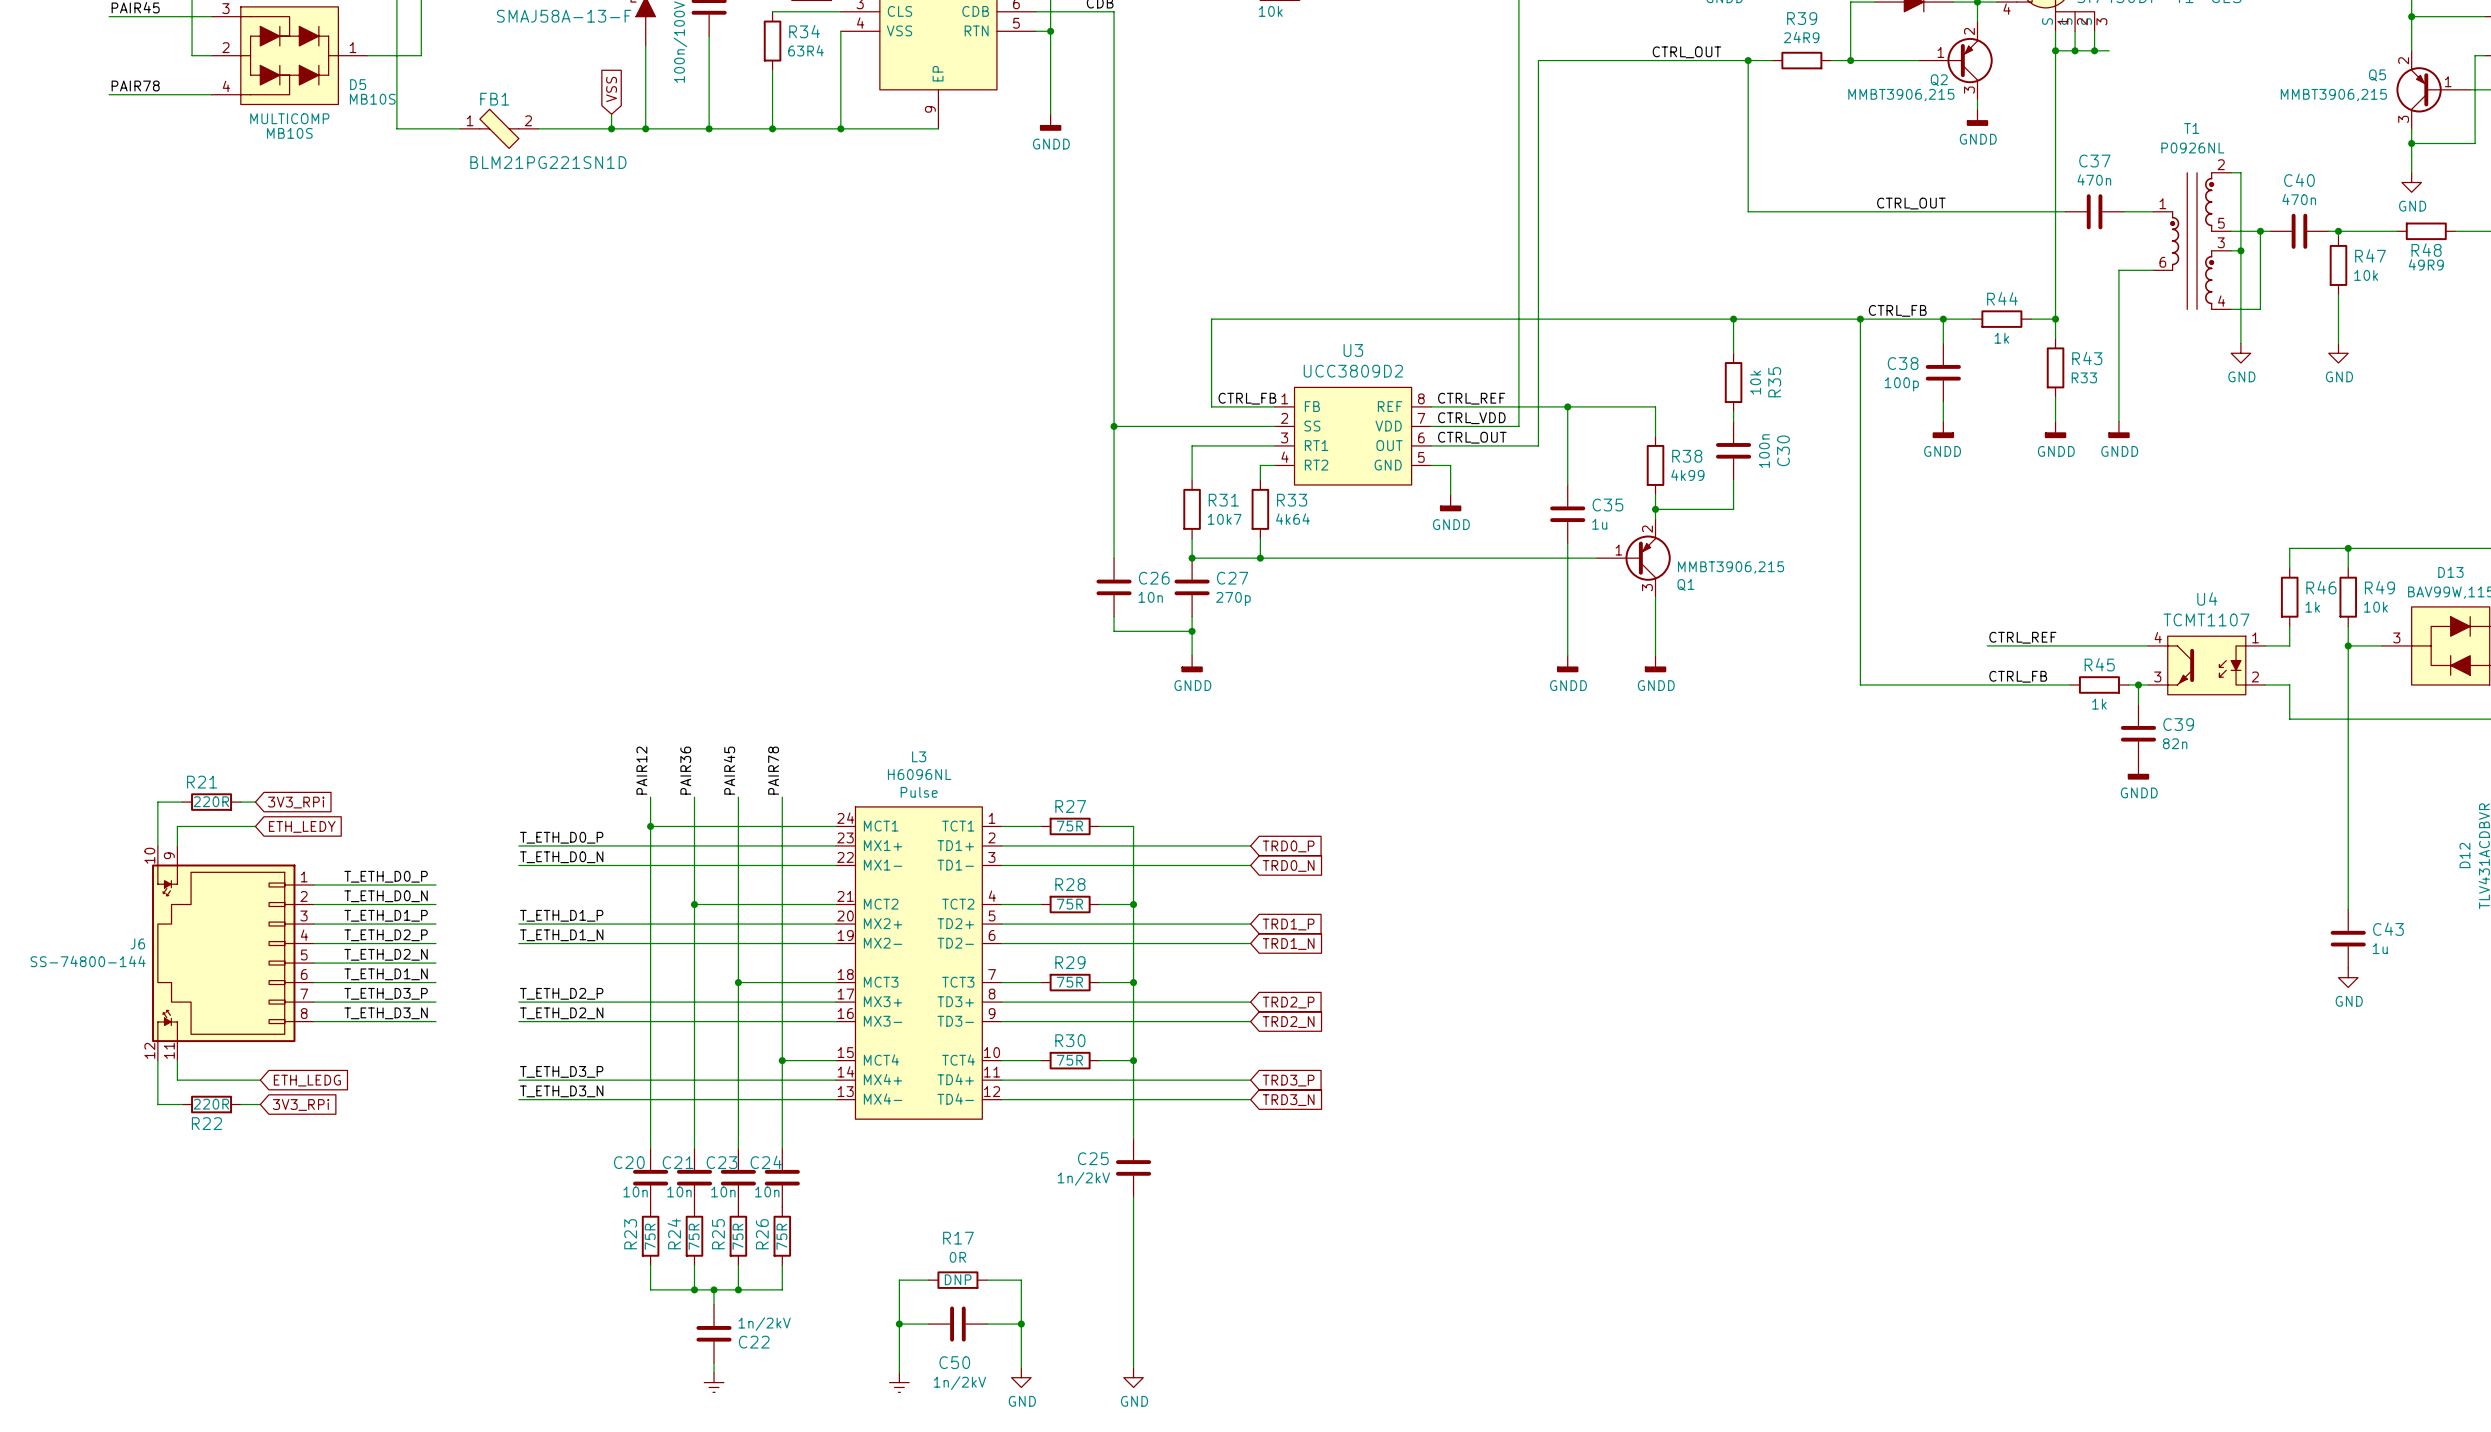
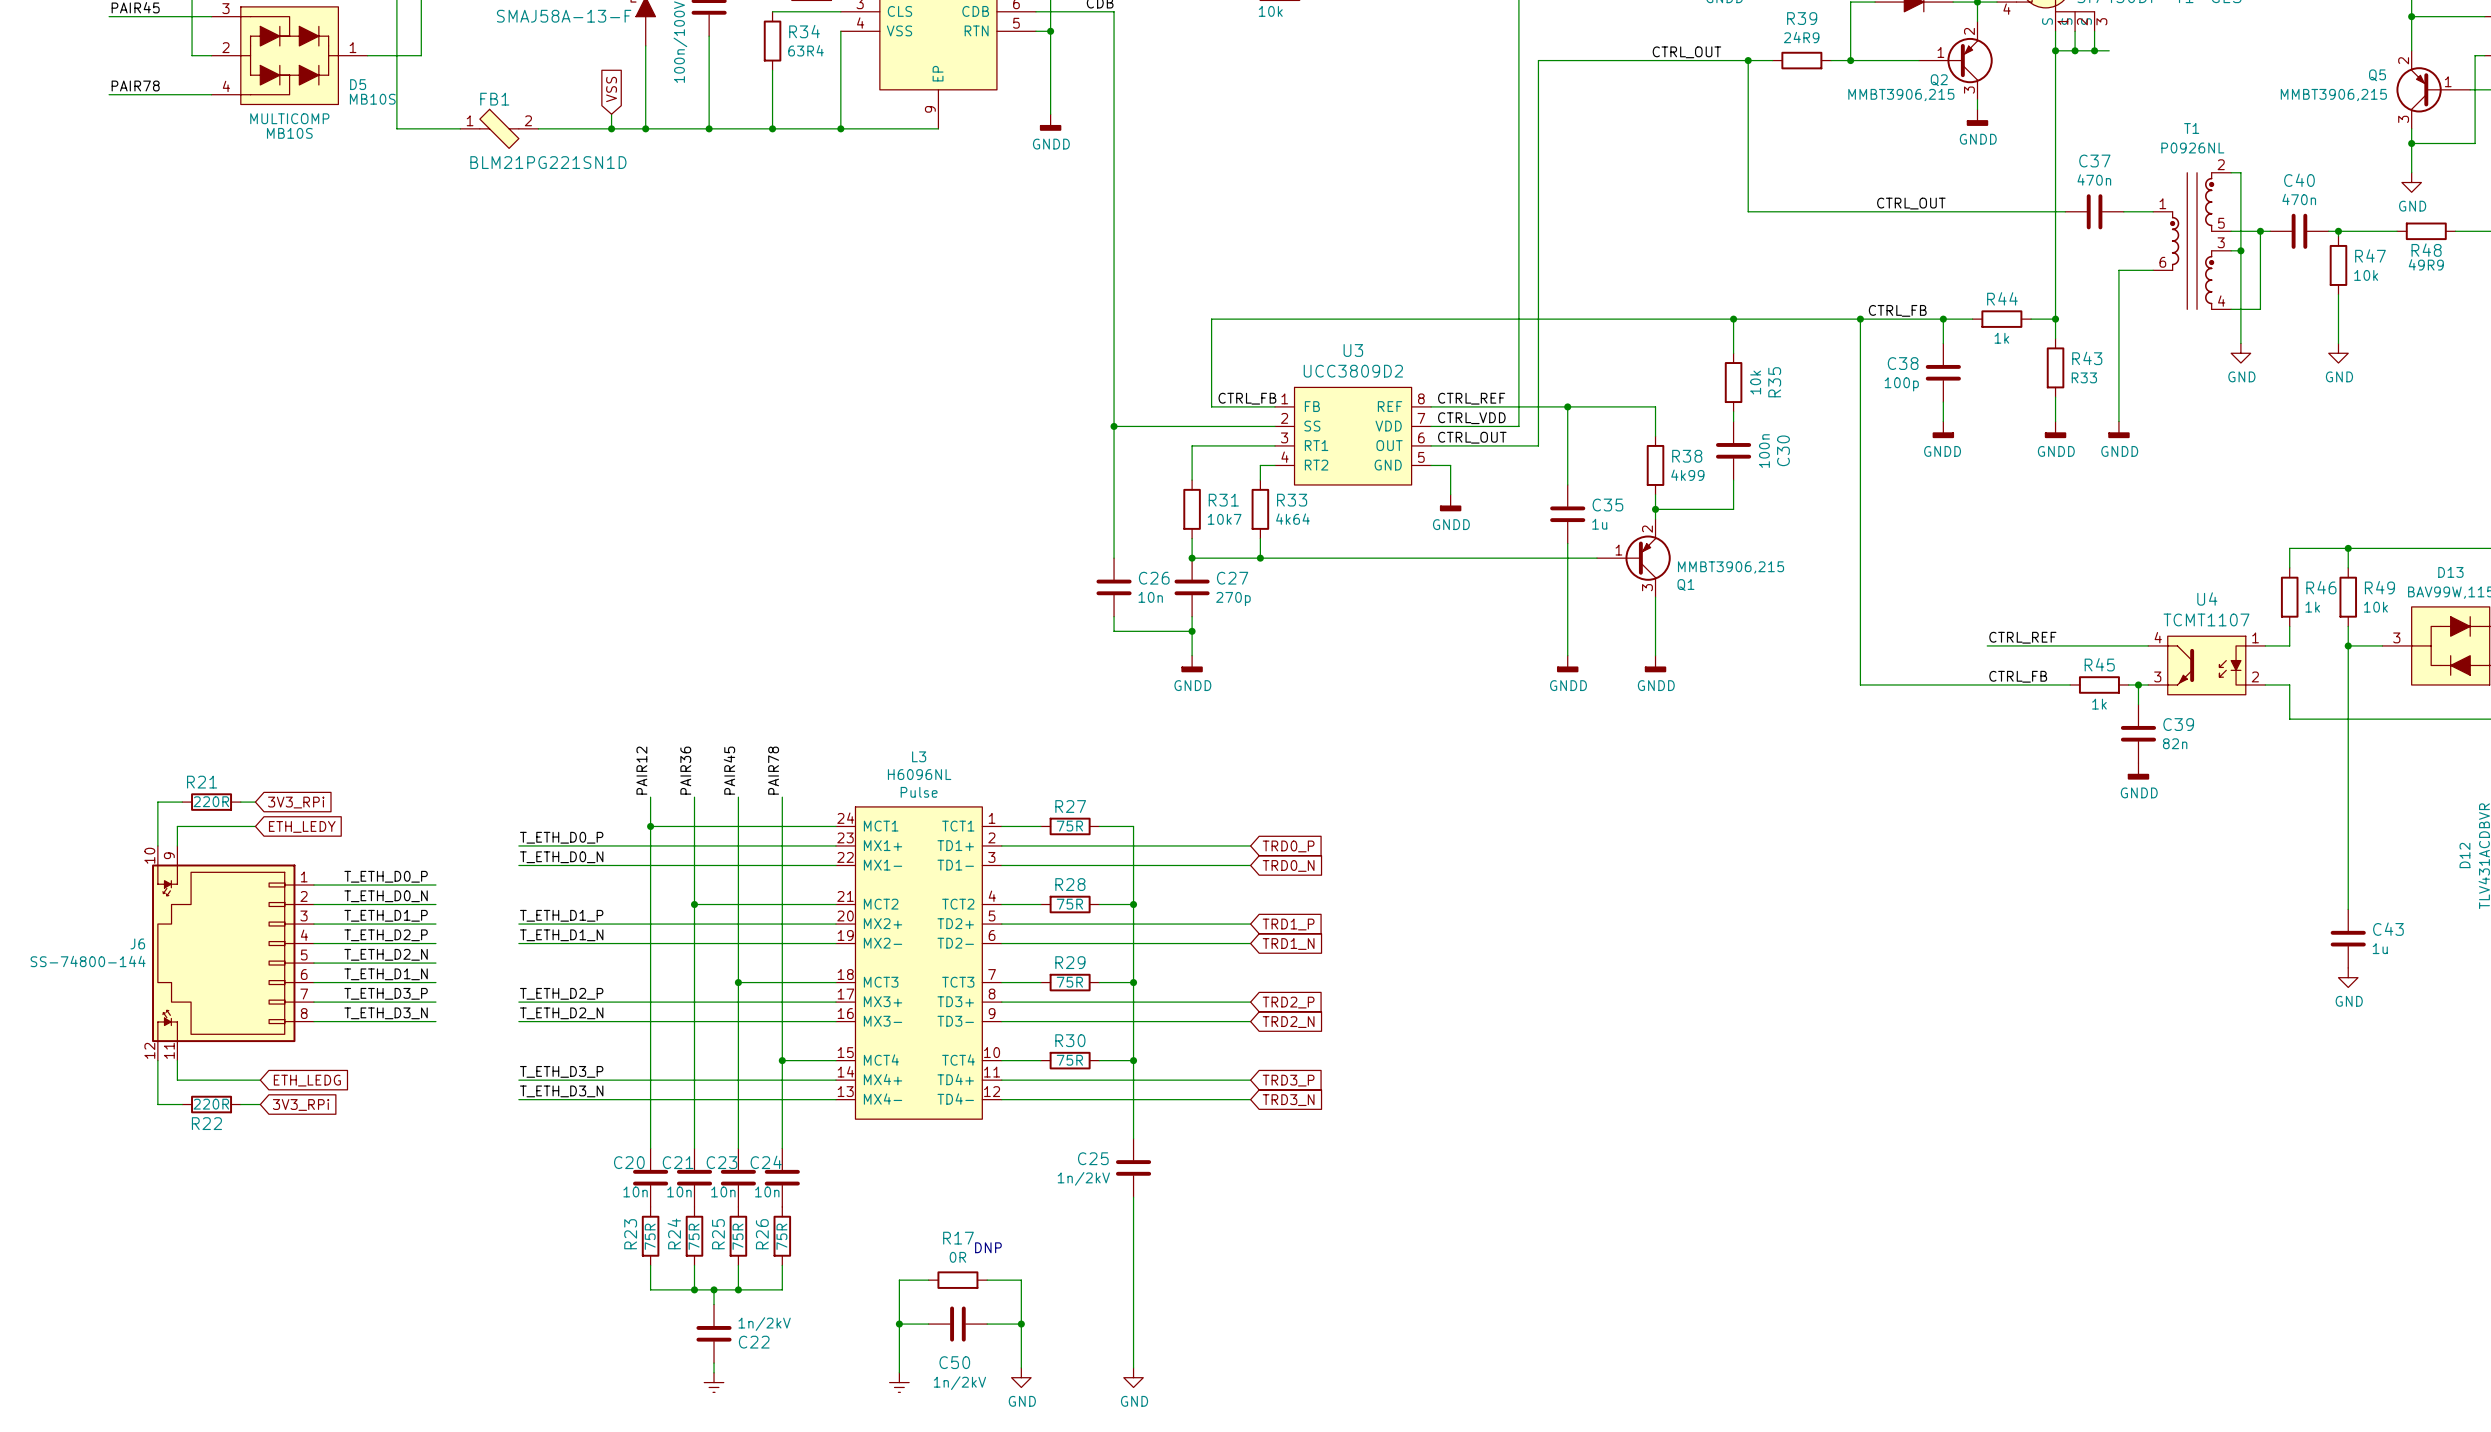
text: none -> DNP (988, 1247)
R17 text: DNP (958, 1279) -> none

